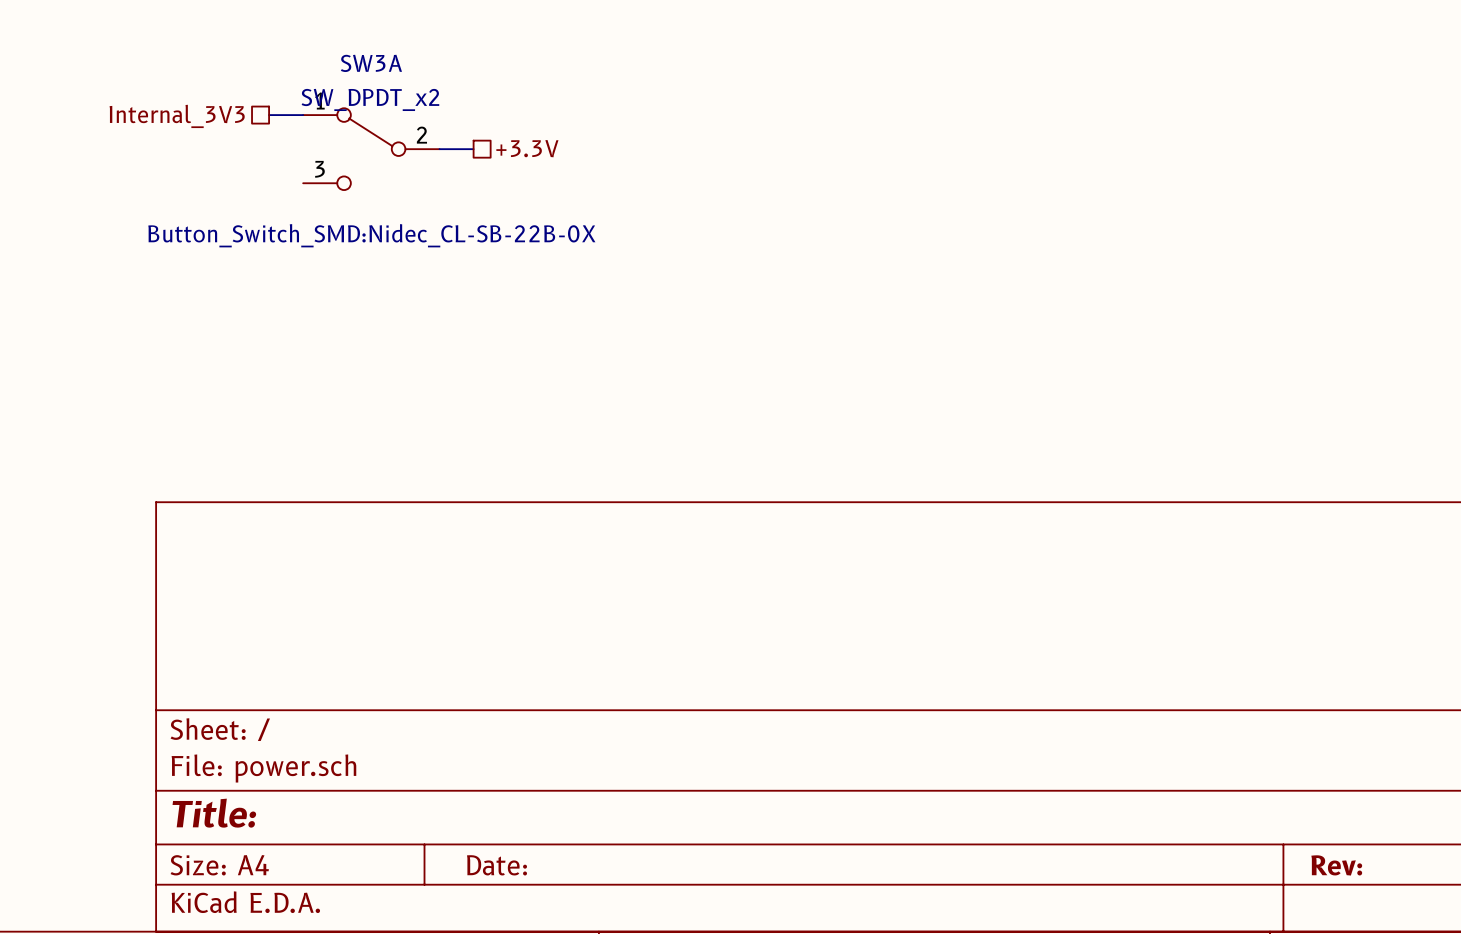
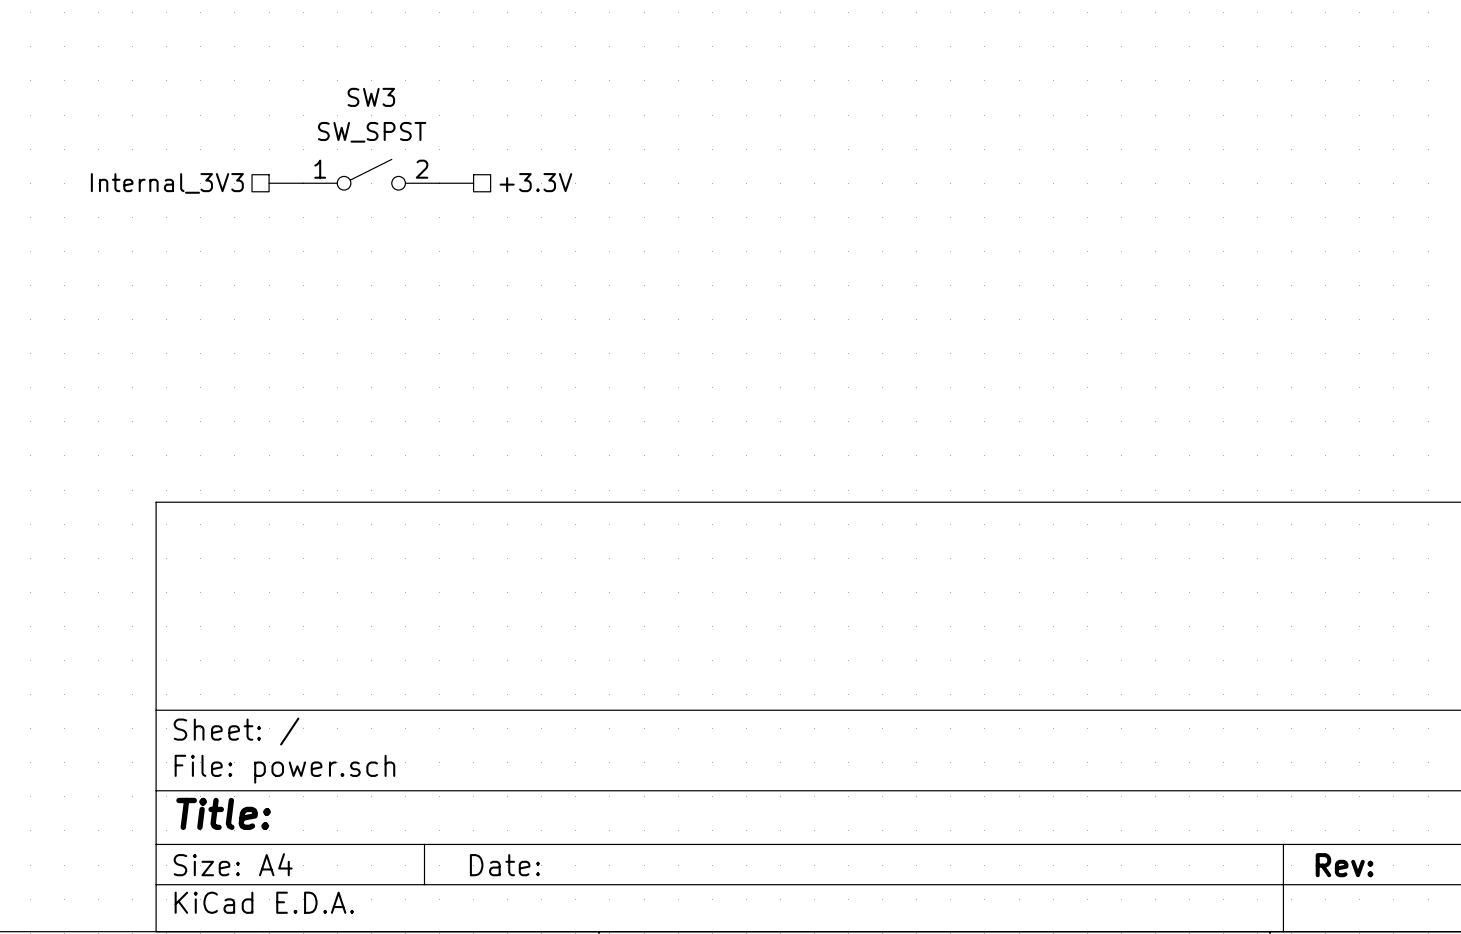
wire: (269, 115) (303, 115) -> (269, 183) (303, 183)
hierarchical label position: Internal_3V3 (177, 116) -> Internal_3V3 (167, 183)
hierarchical label position: +3.3V (527, 148) -> +3.3V (535, 182)
SW3A: SW_DPDT_x2 (371, 149) -> none
wire: (439, 149) (473, 149) -> (439, 183) (473, 183)
SW3: none -> SW_SPST (371, 174)

